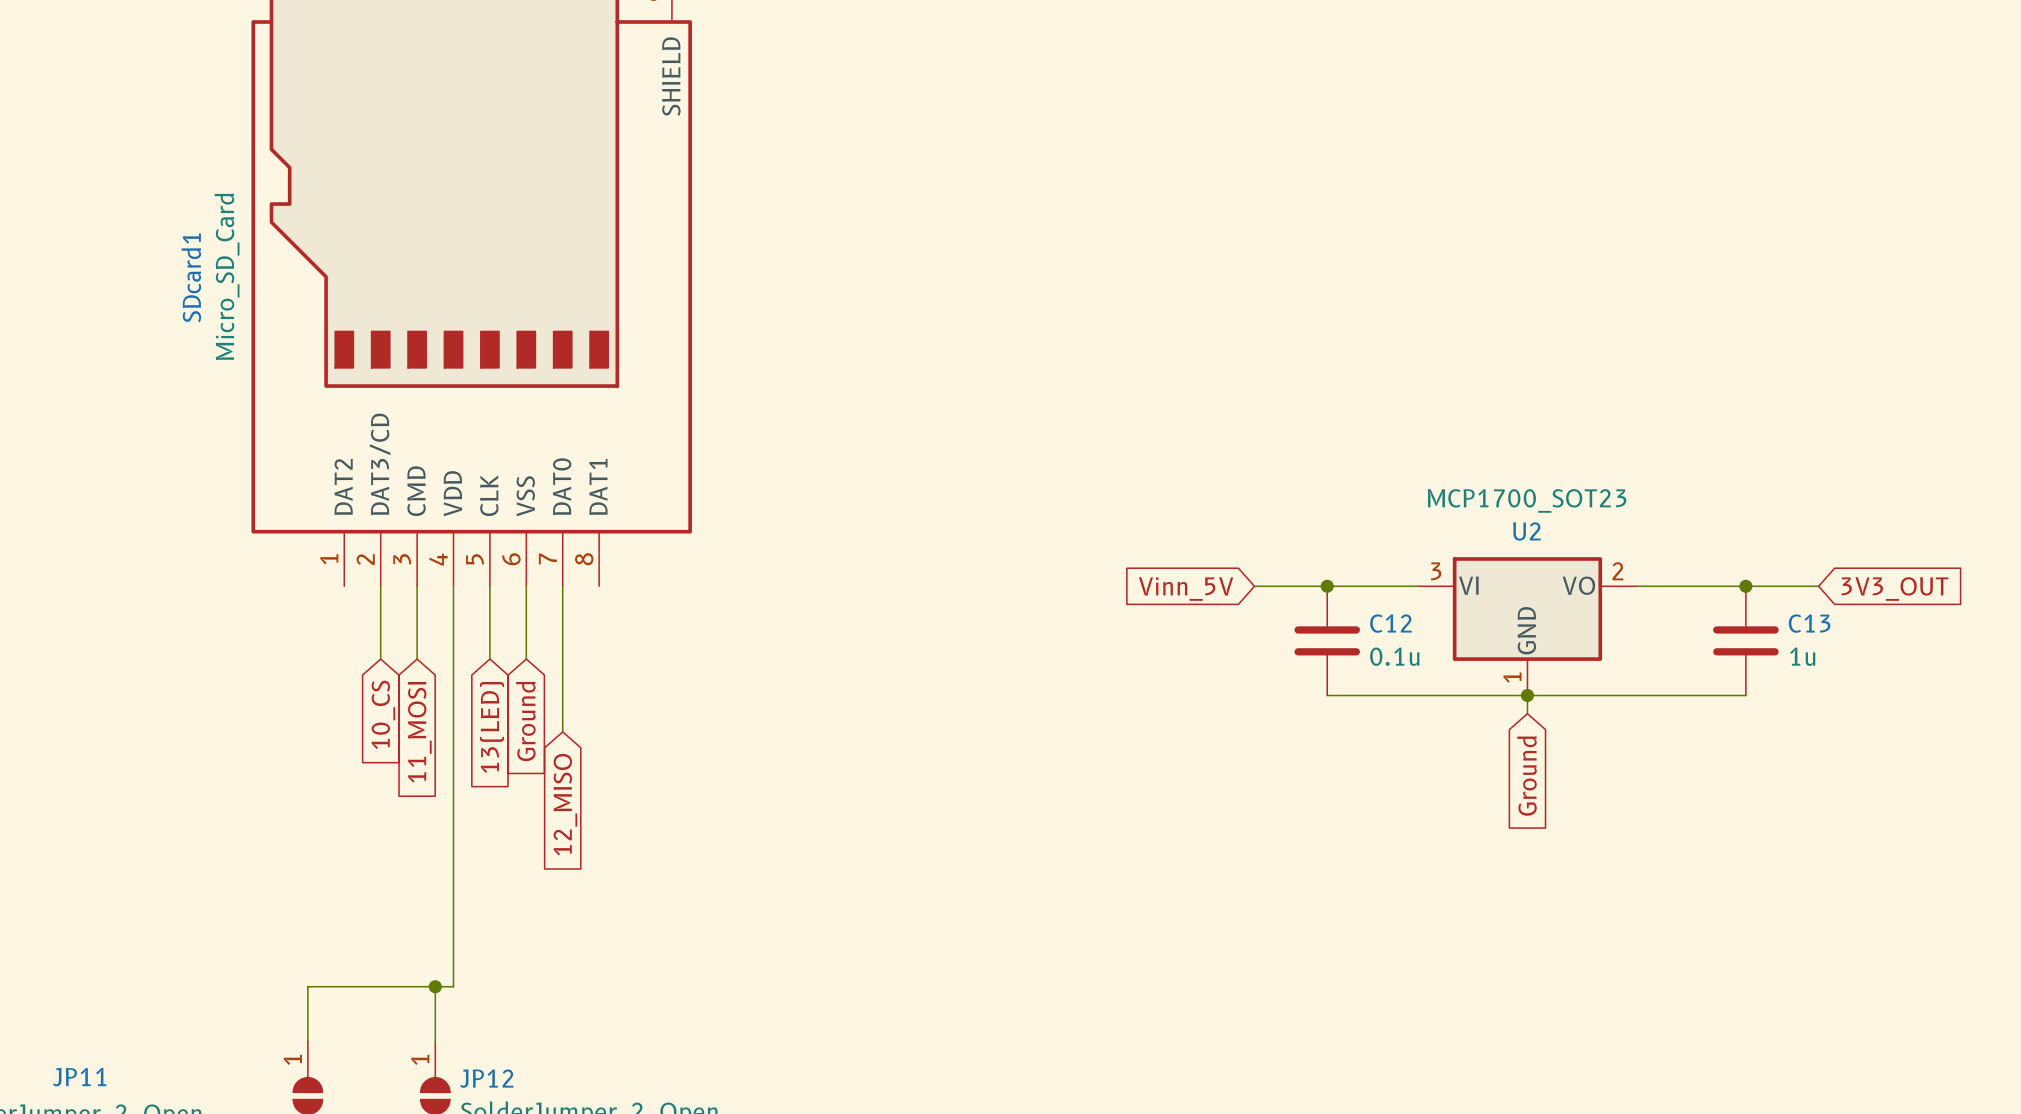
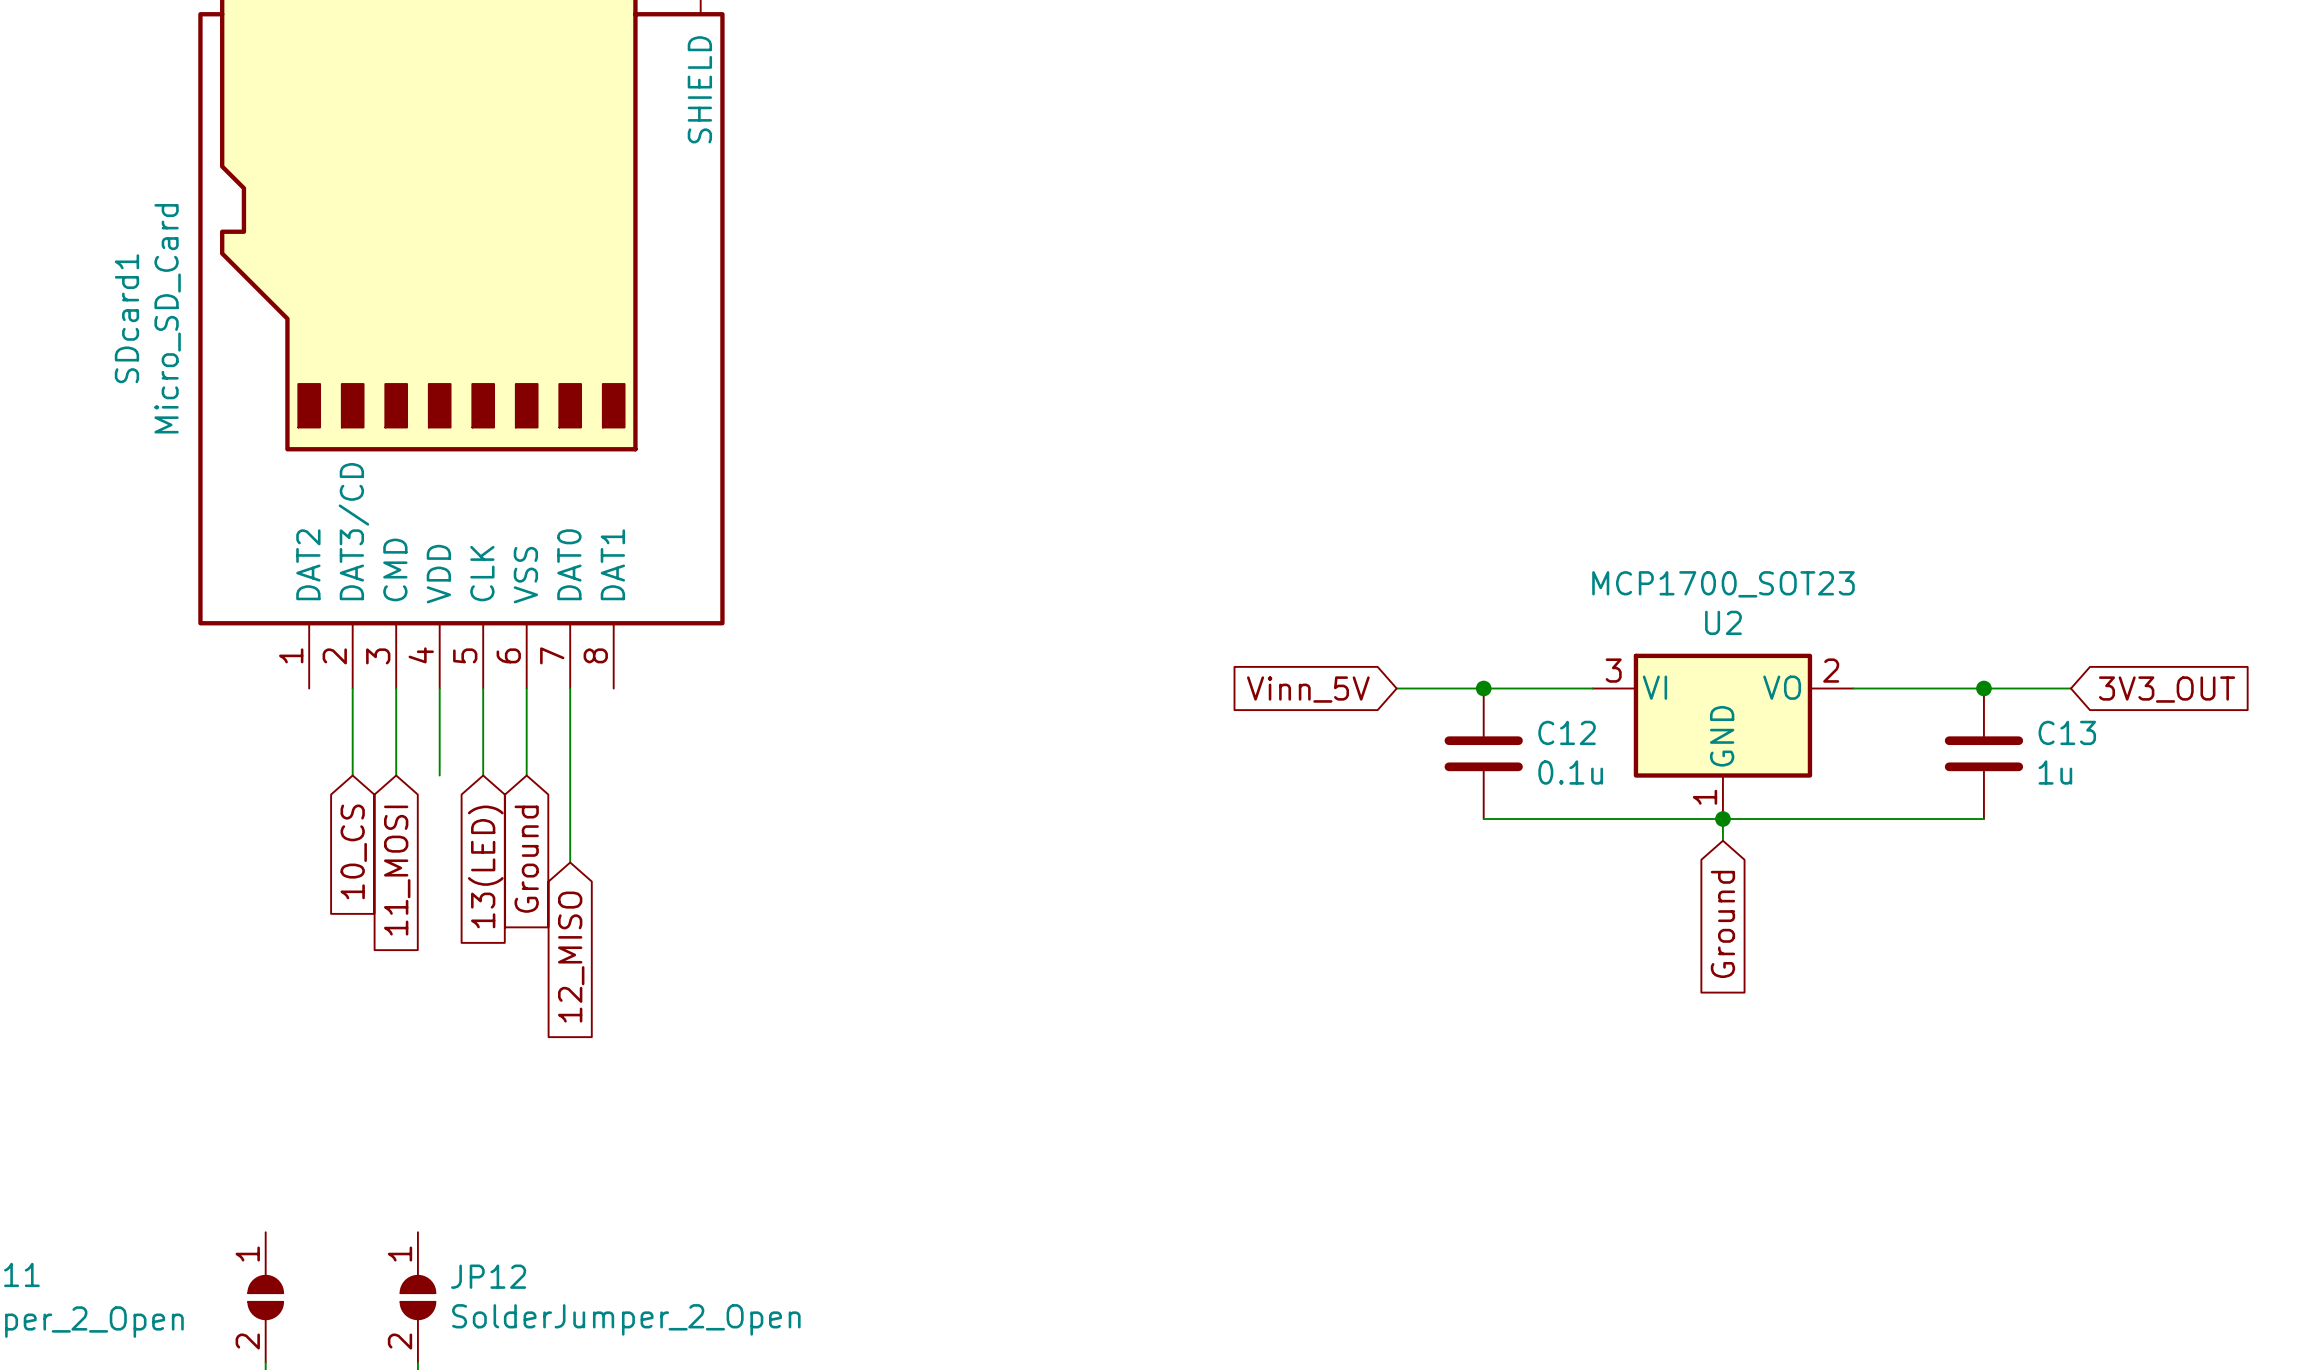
wire: (453, 659) (453, 986) (307, 986) (307, 1041) -> none
wire: (435, 986) (435, 1041) -> none
junction: (435, 986) -> none

